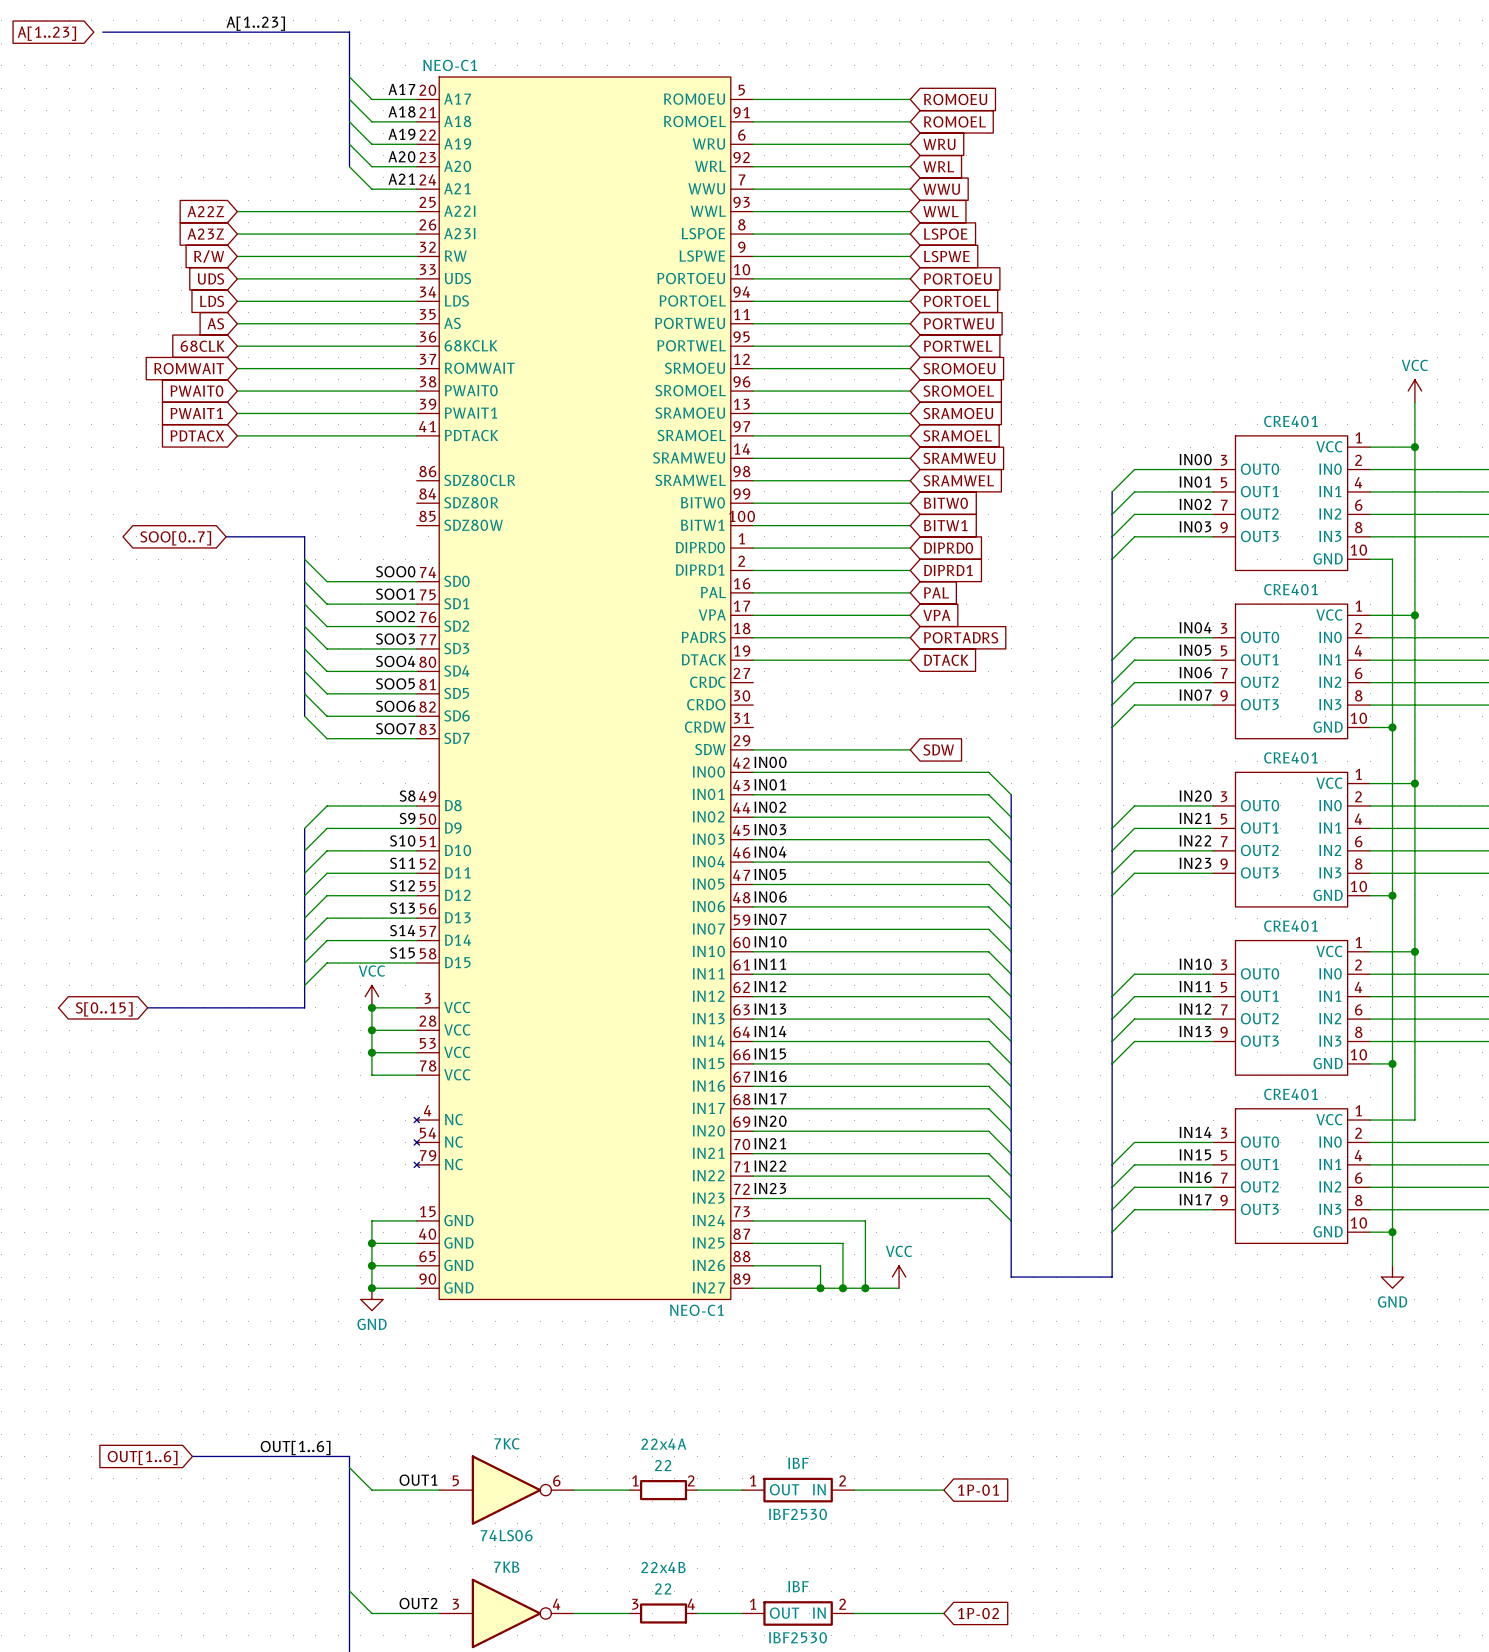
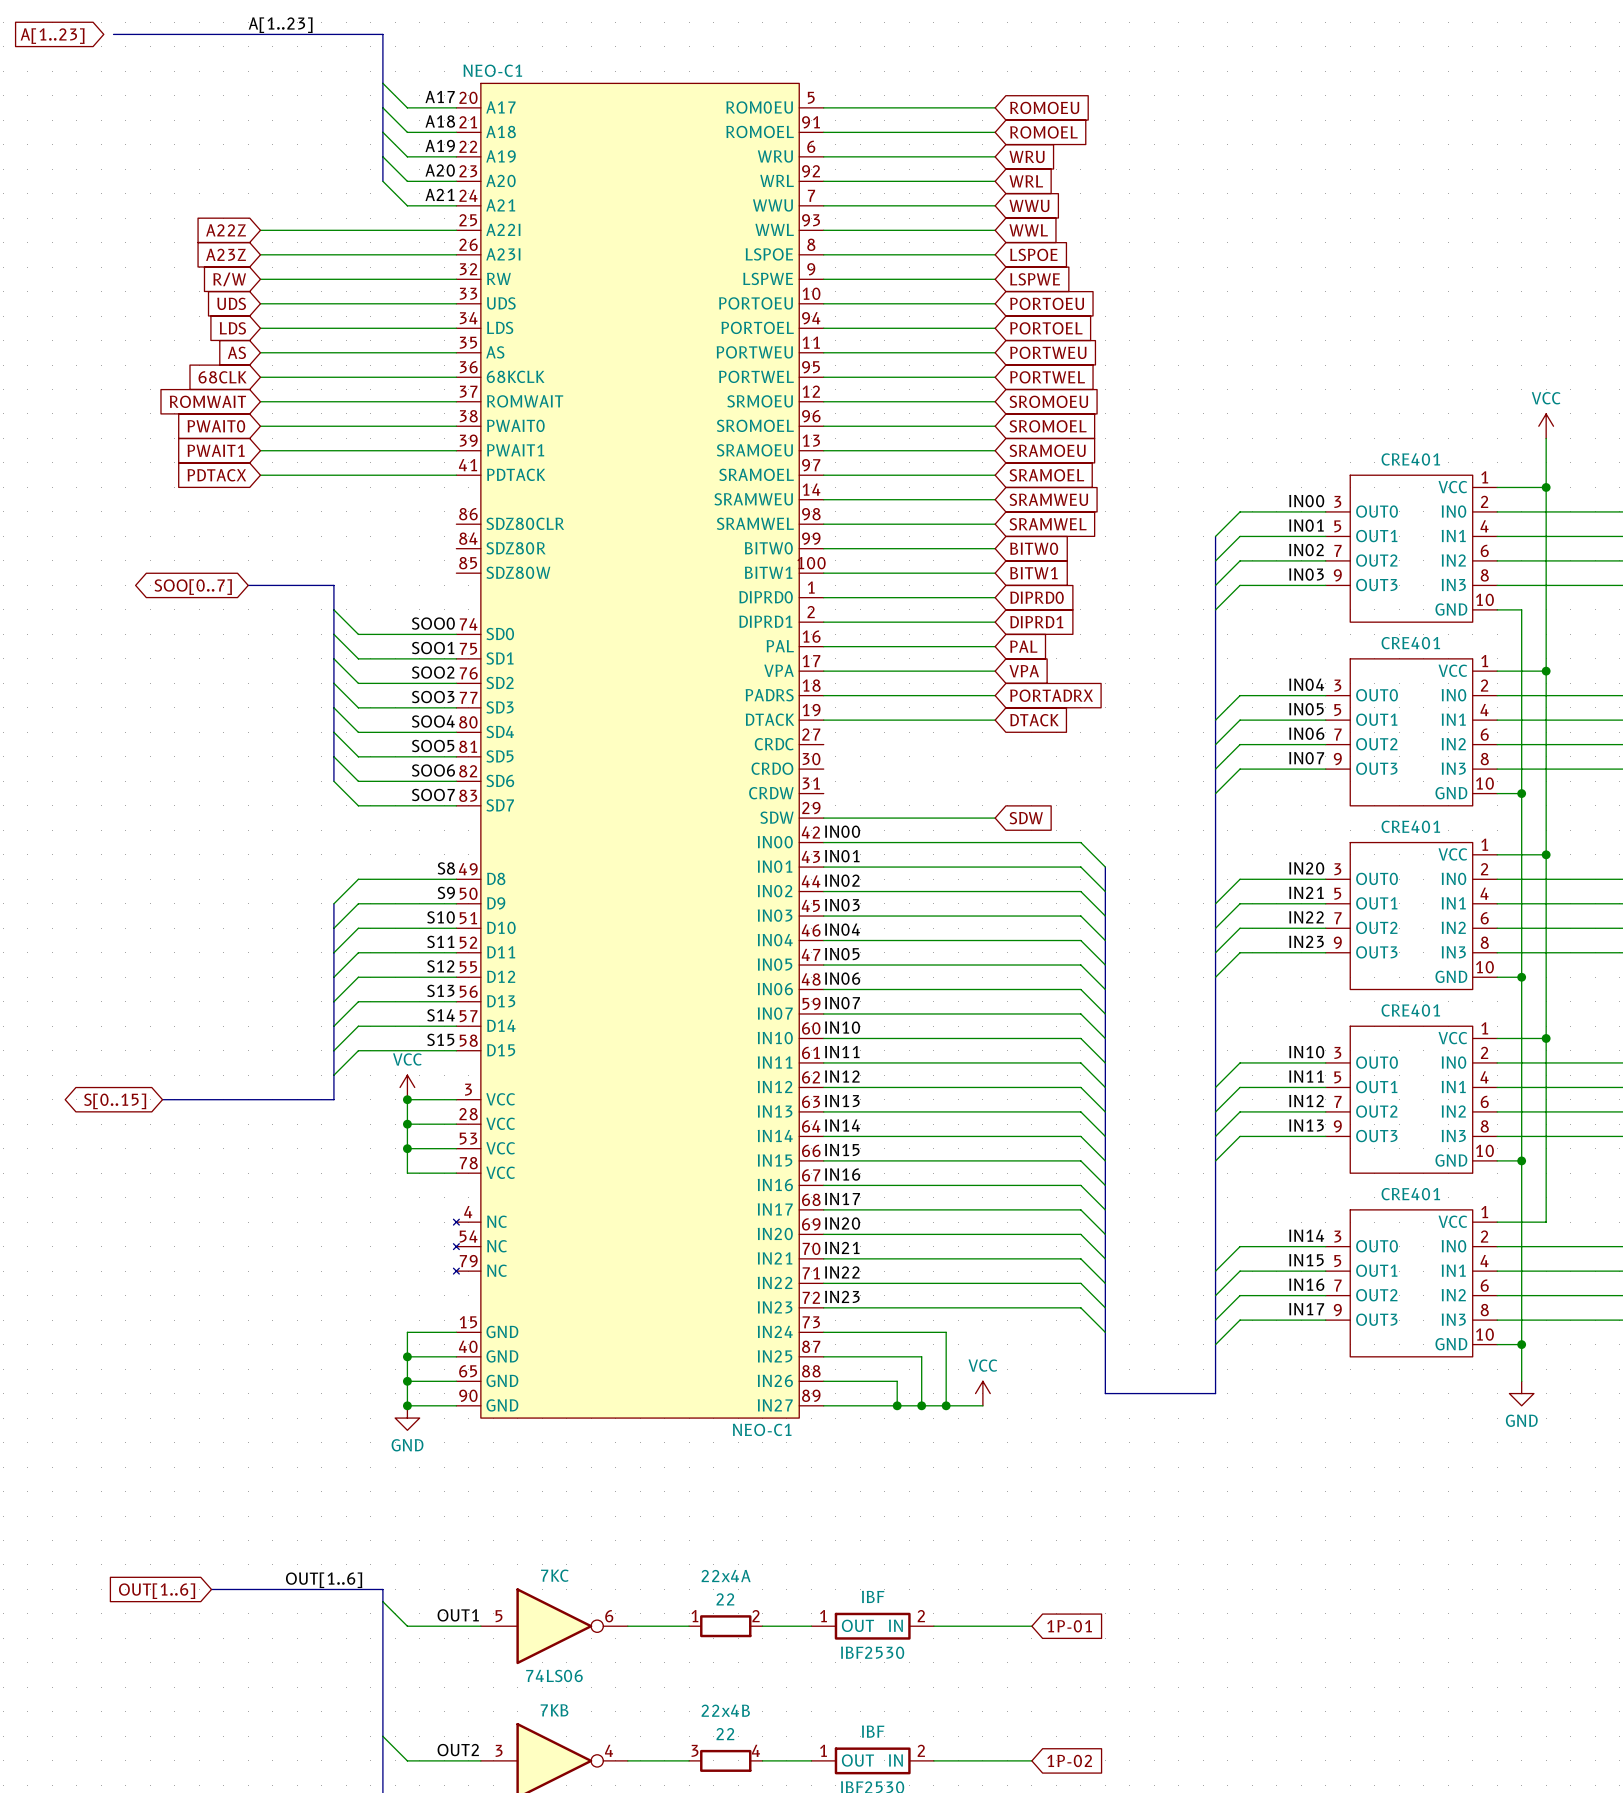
global label: PORTADRS (961, 637) -> PORTADRX (1051, 695)

